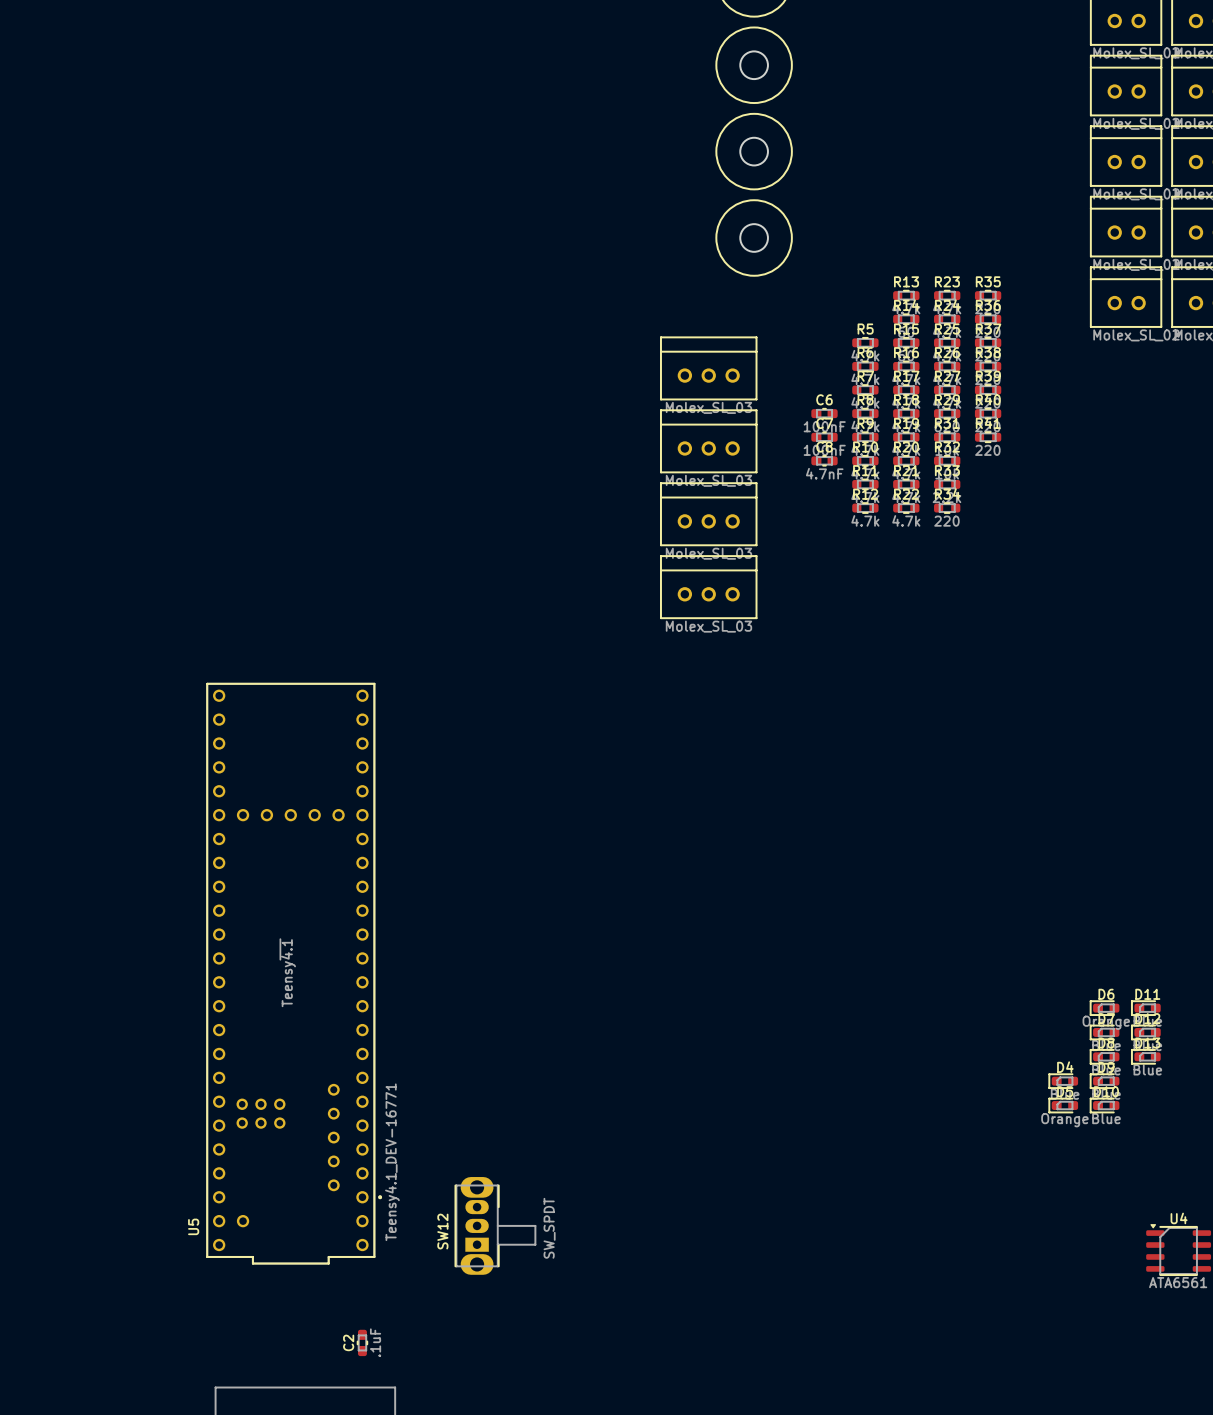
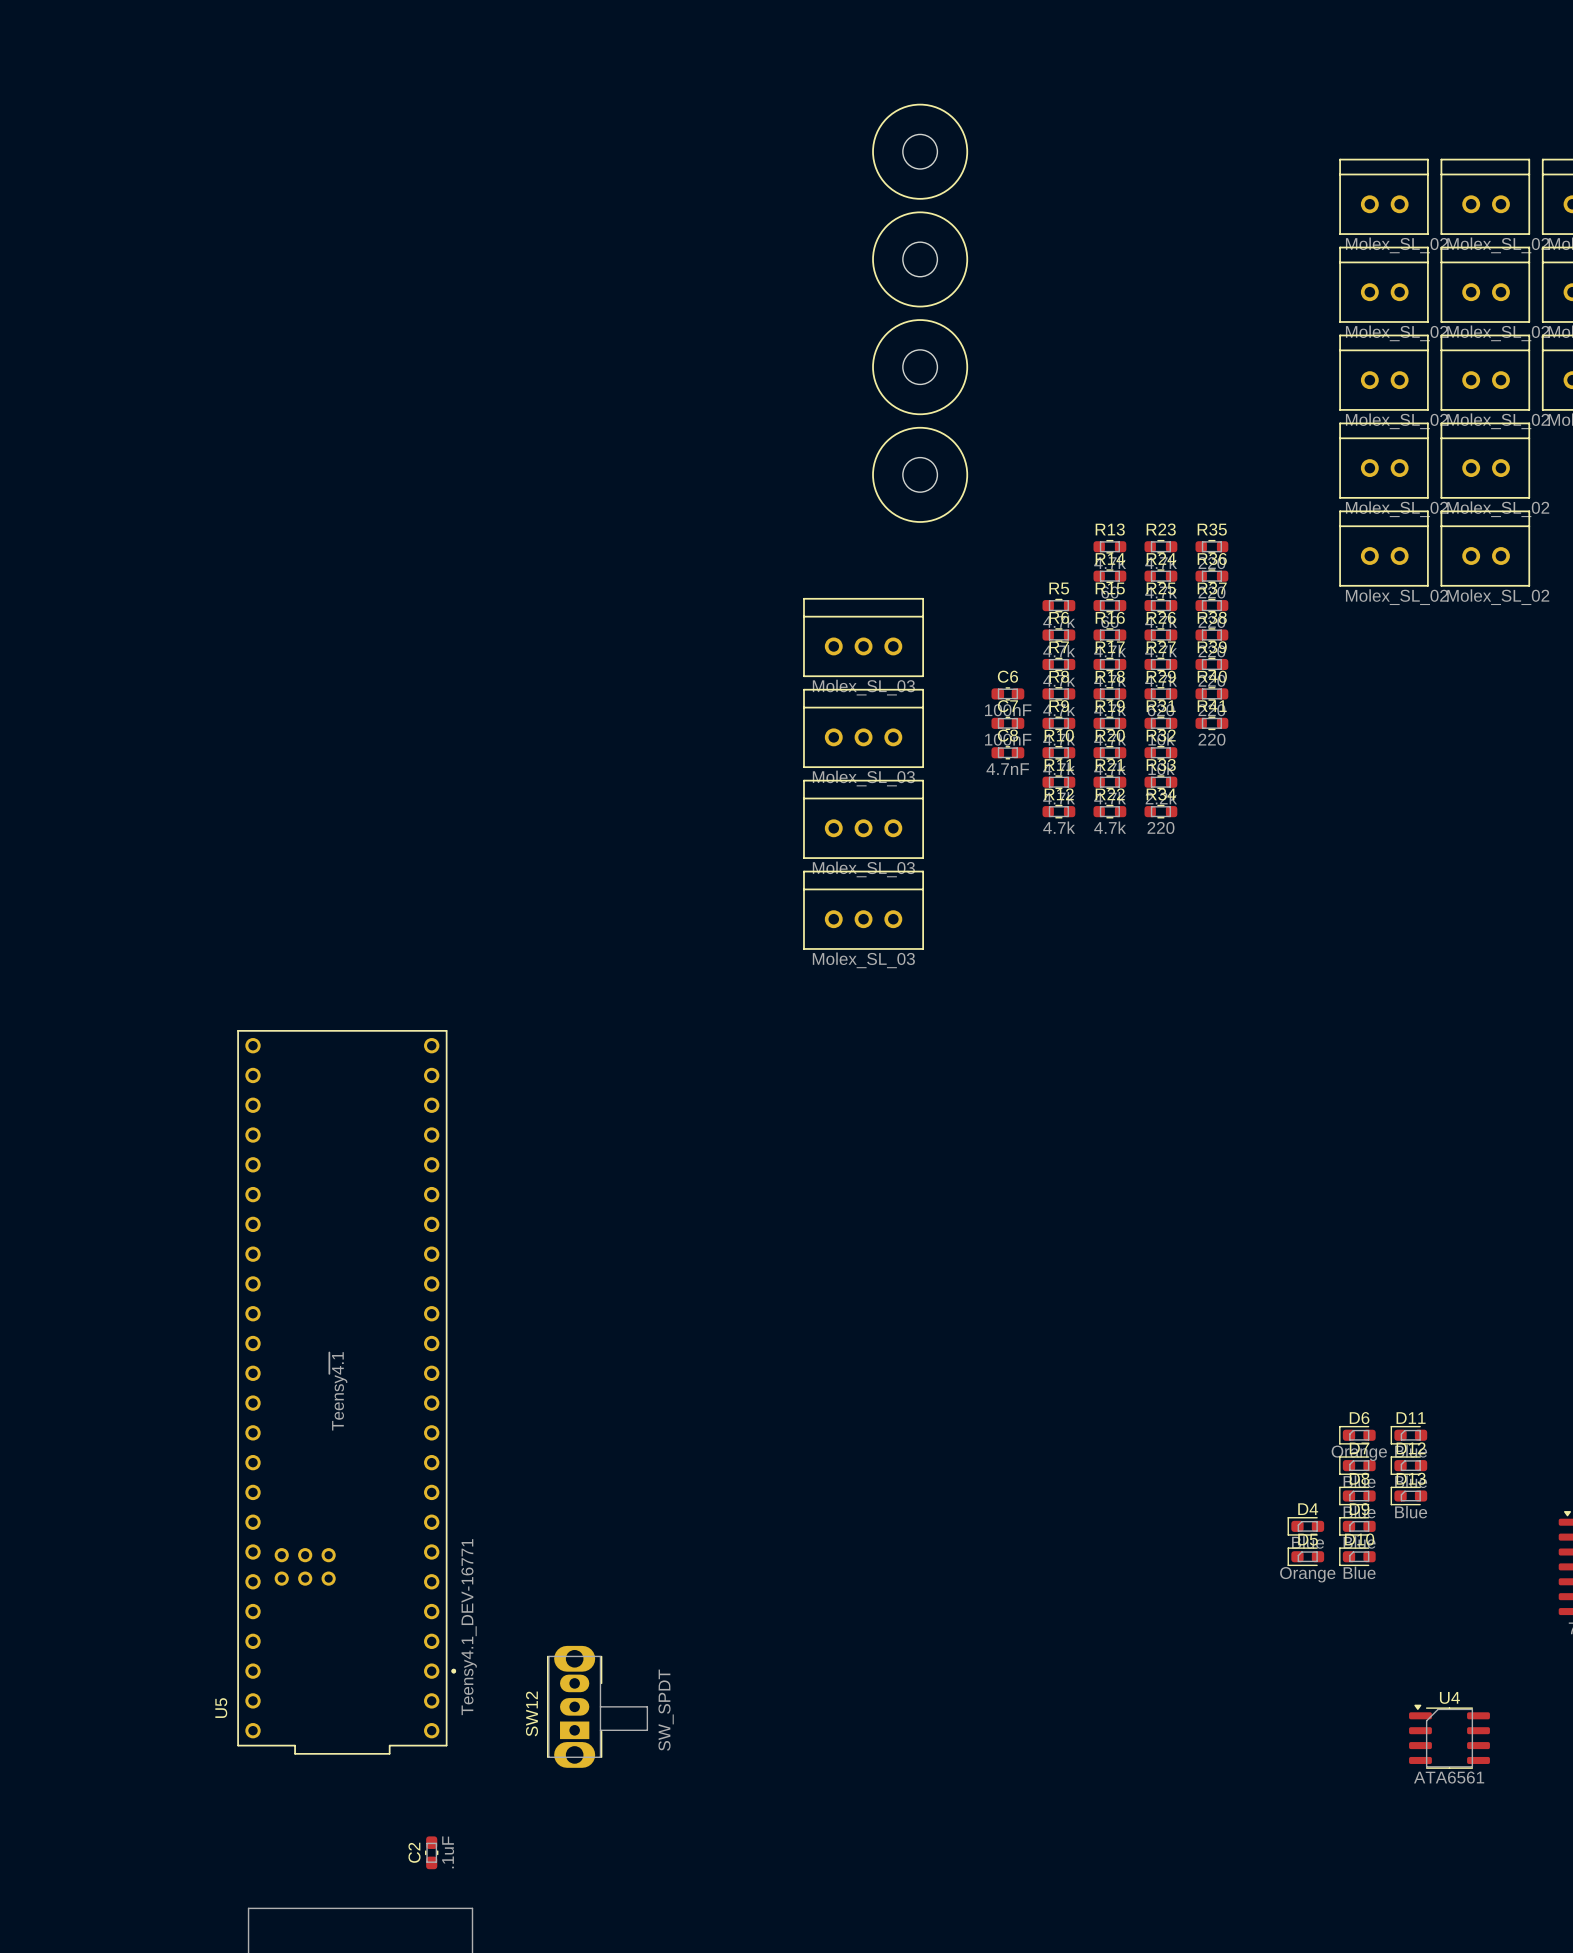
U5 footprint: [206, 683, 383, 1265] -> [237, 1030, 457, 1755]

